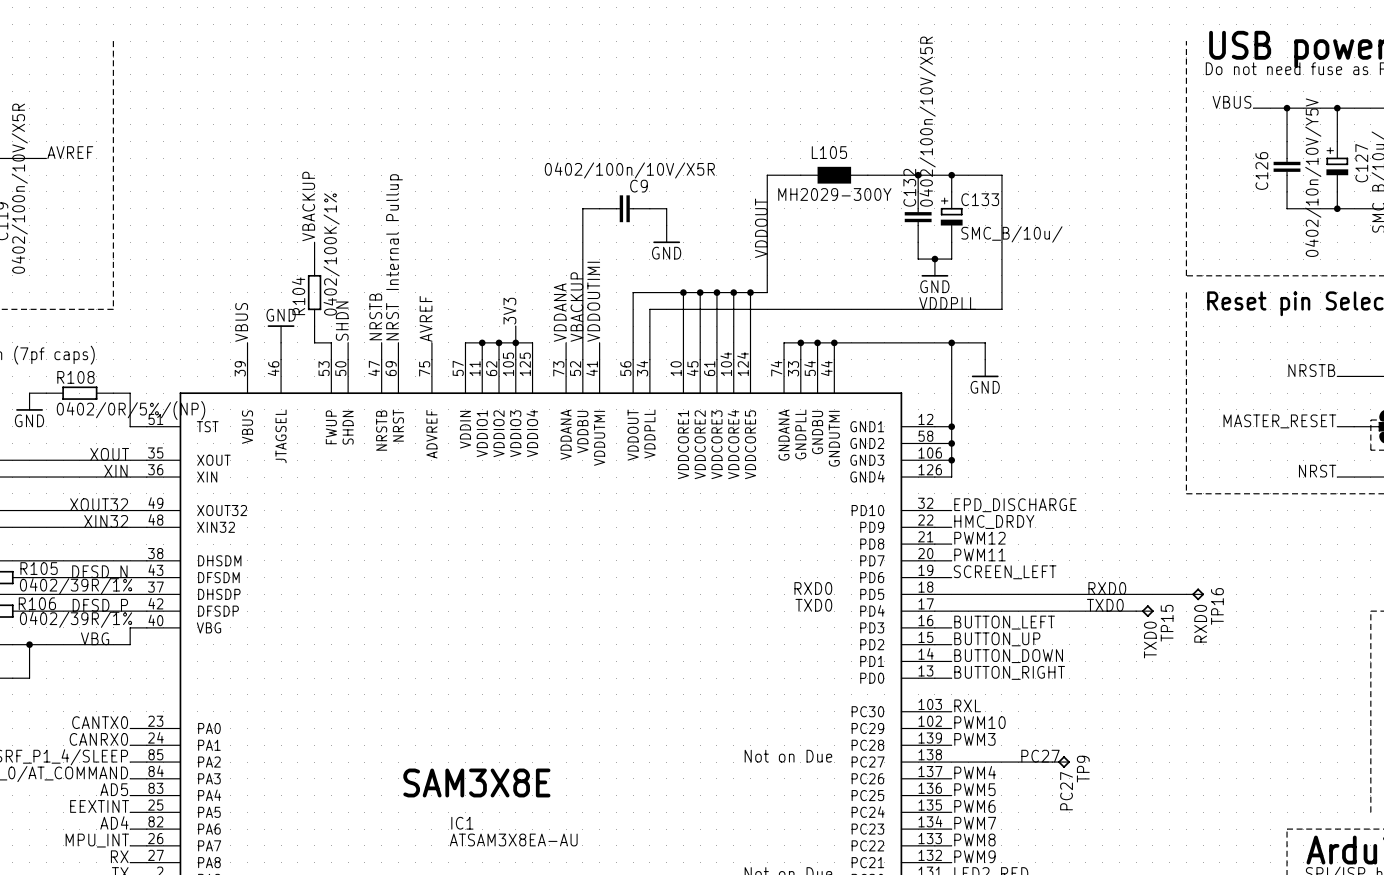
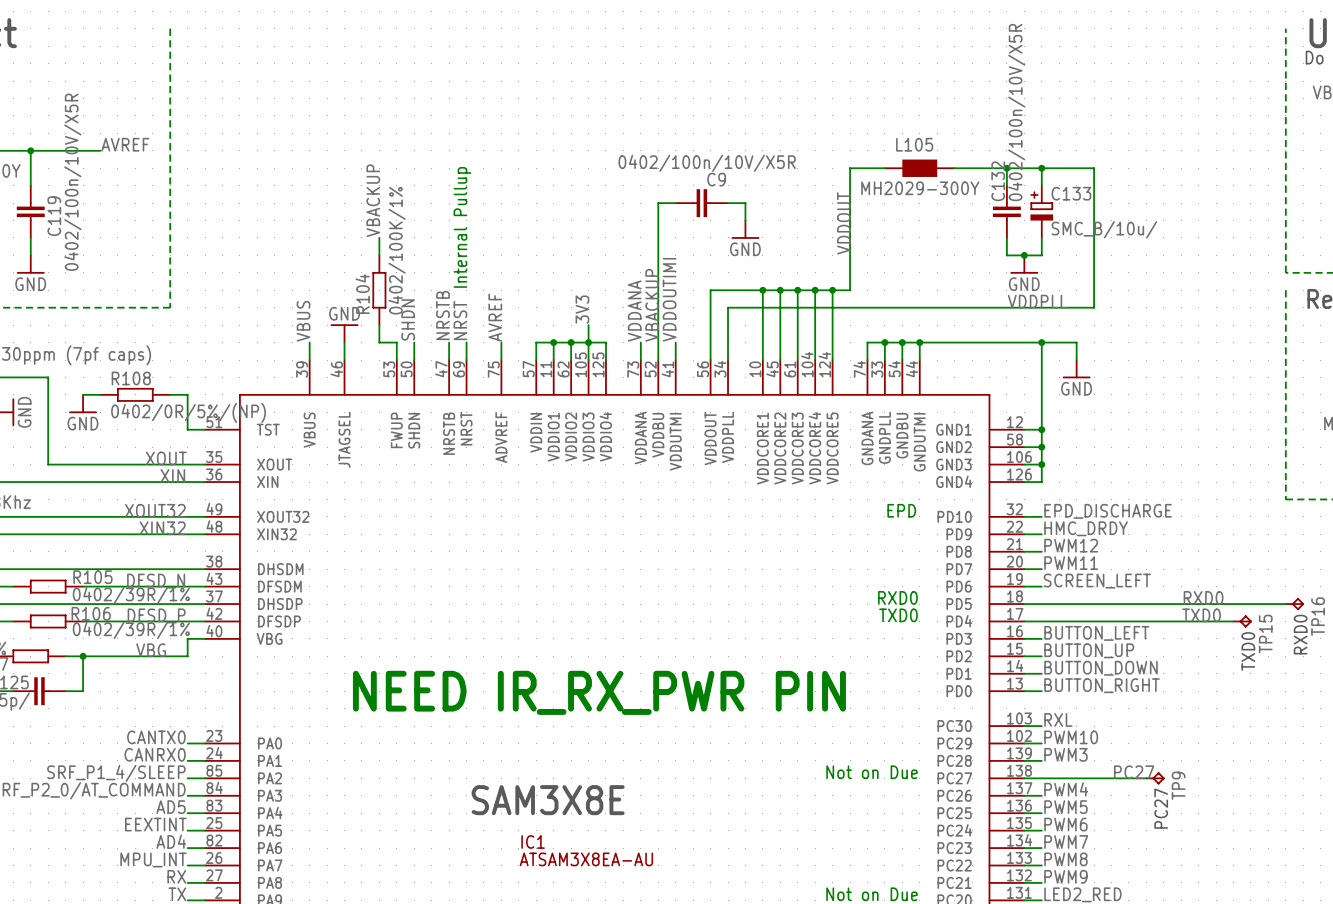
text: none -> EPD (901, 510)
text: none -> NEED IR_RX_PWR PIN (599, 692)

